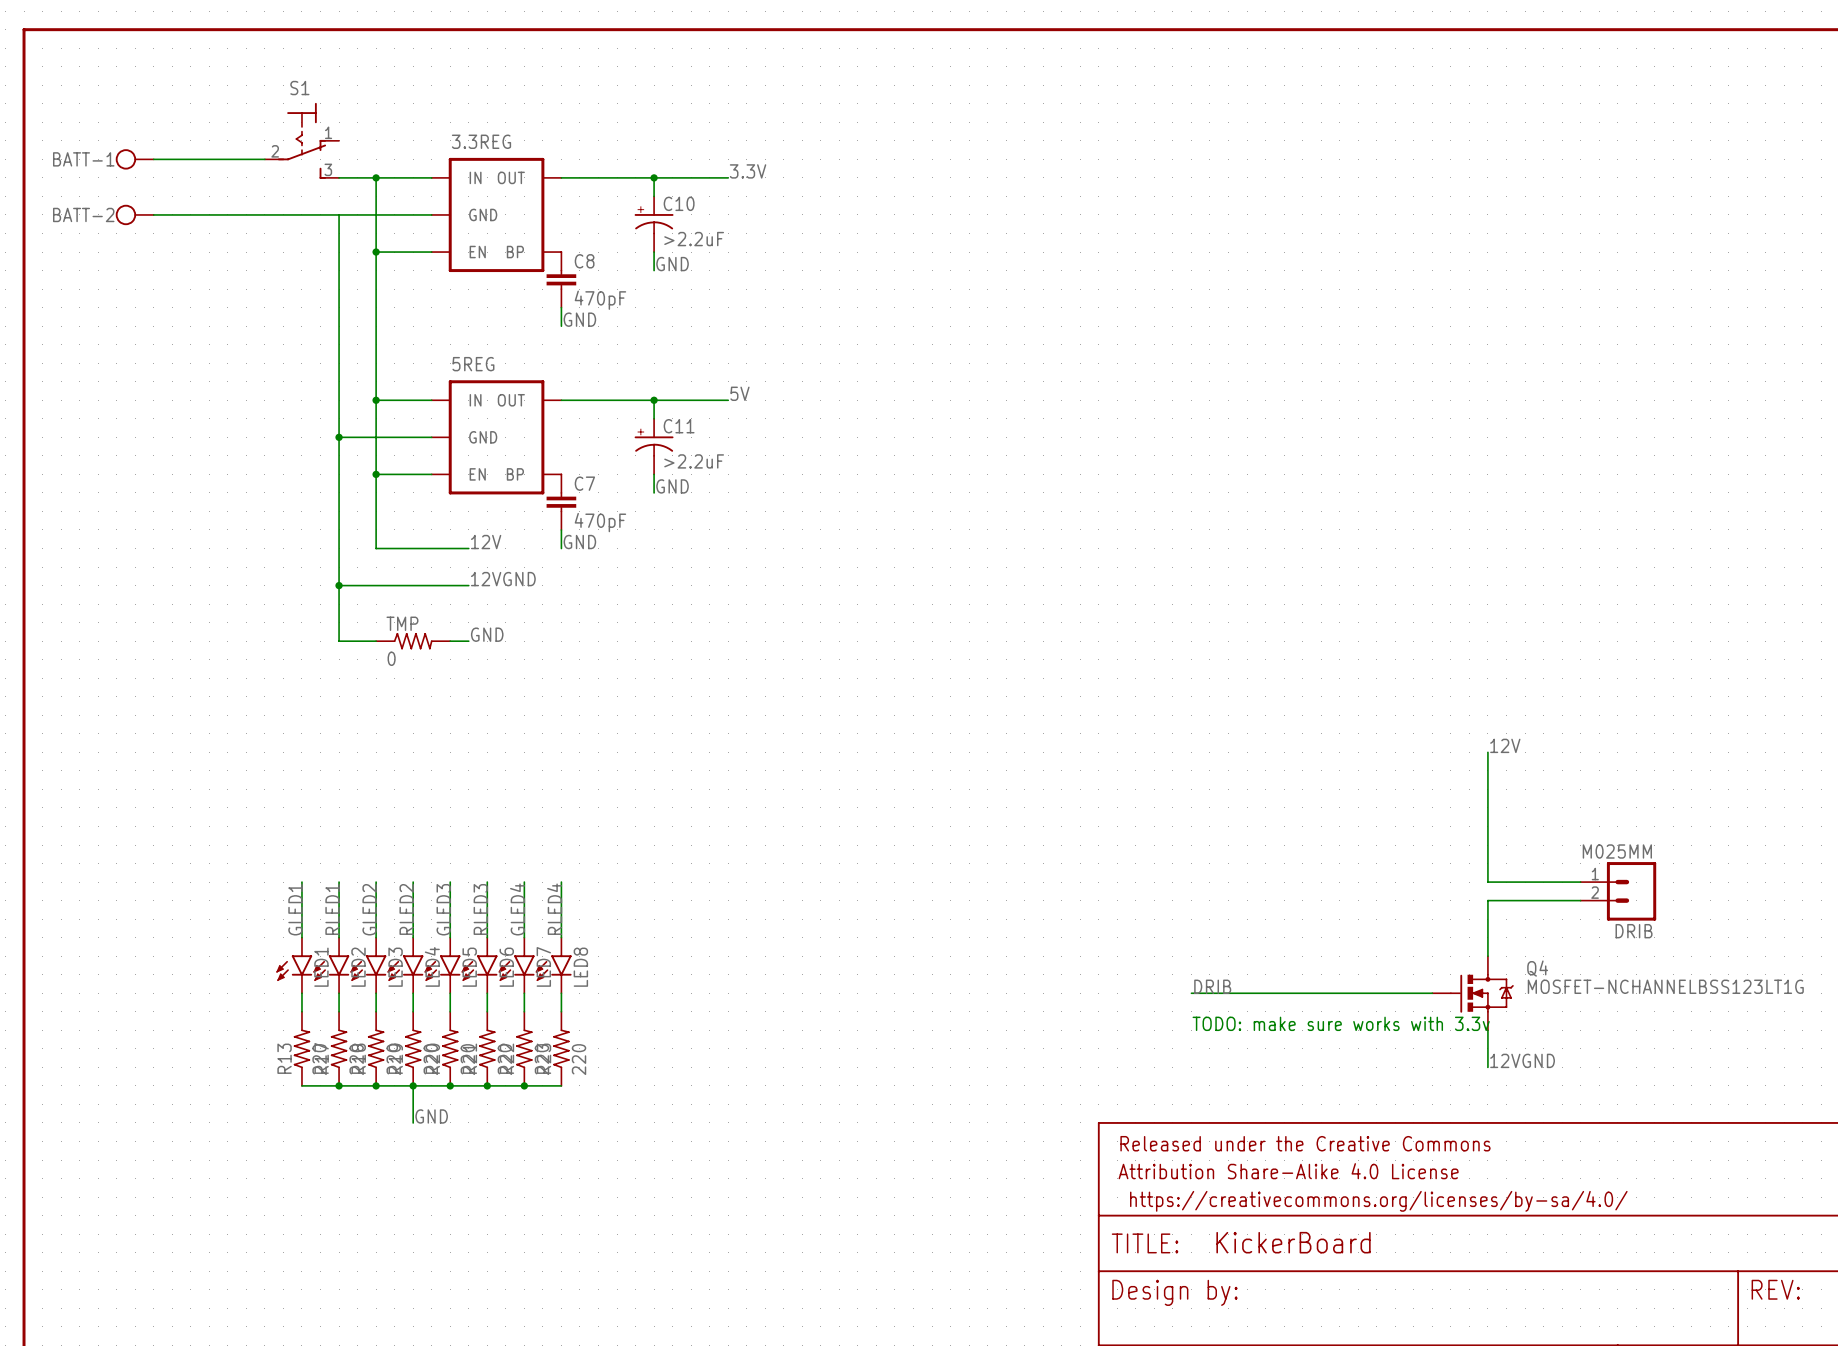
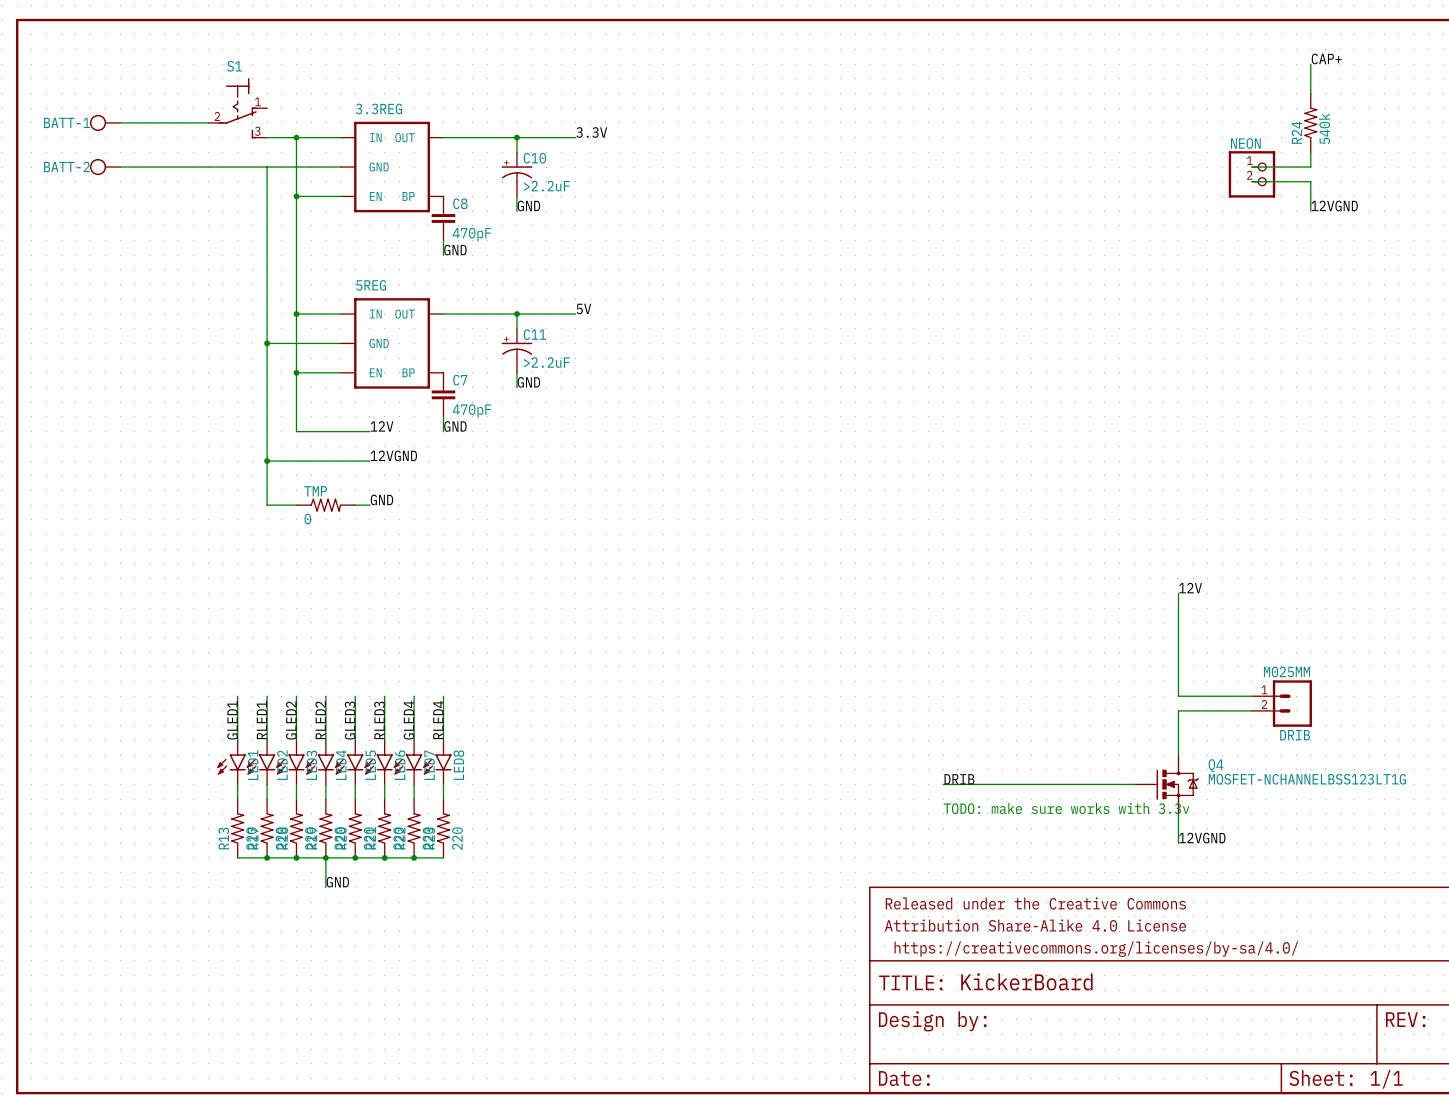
label: none -> CAP+ (1326, 58)
wire: none -> (1310, 64) (1310, 93)
R24: none -> 540k (1310, 122)
wire: none -> (1310, 152) (1310, 167) (1251, 167)
NEON: none -> (1251, 174)
wire: none -> (1251, 181) (1310, 181) (1310, 211)
label: none -> 12VGND (1334, 205)

